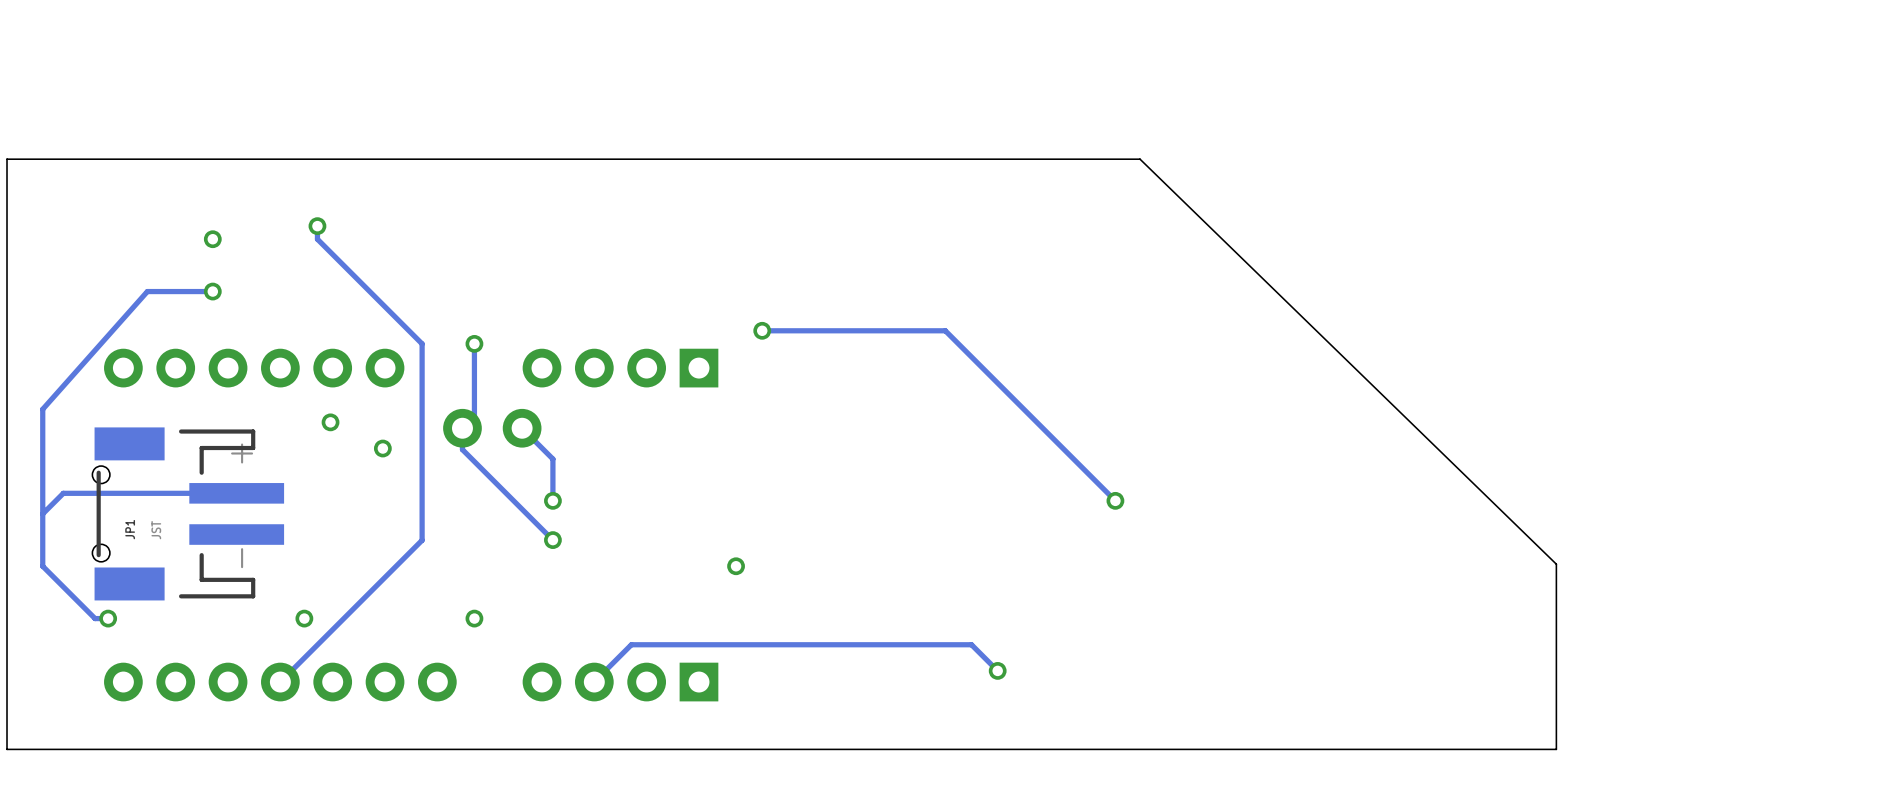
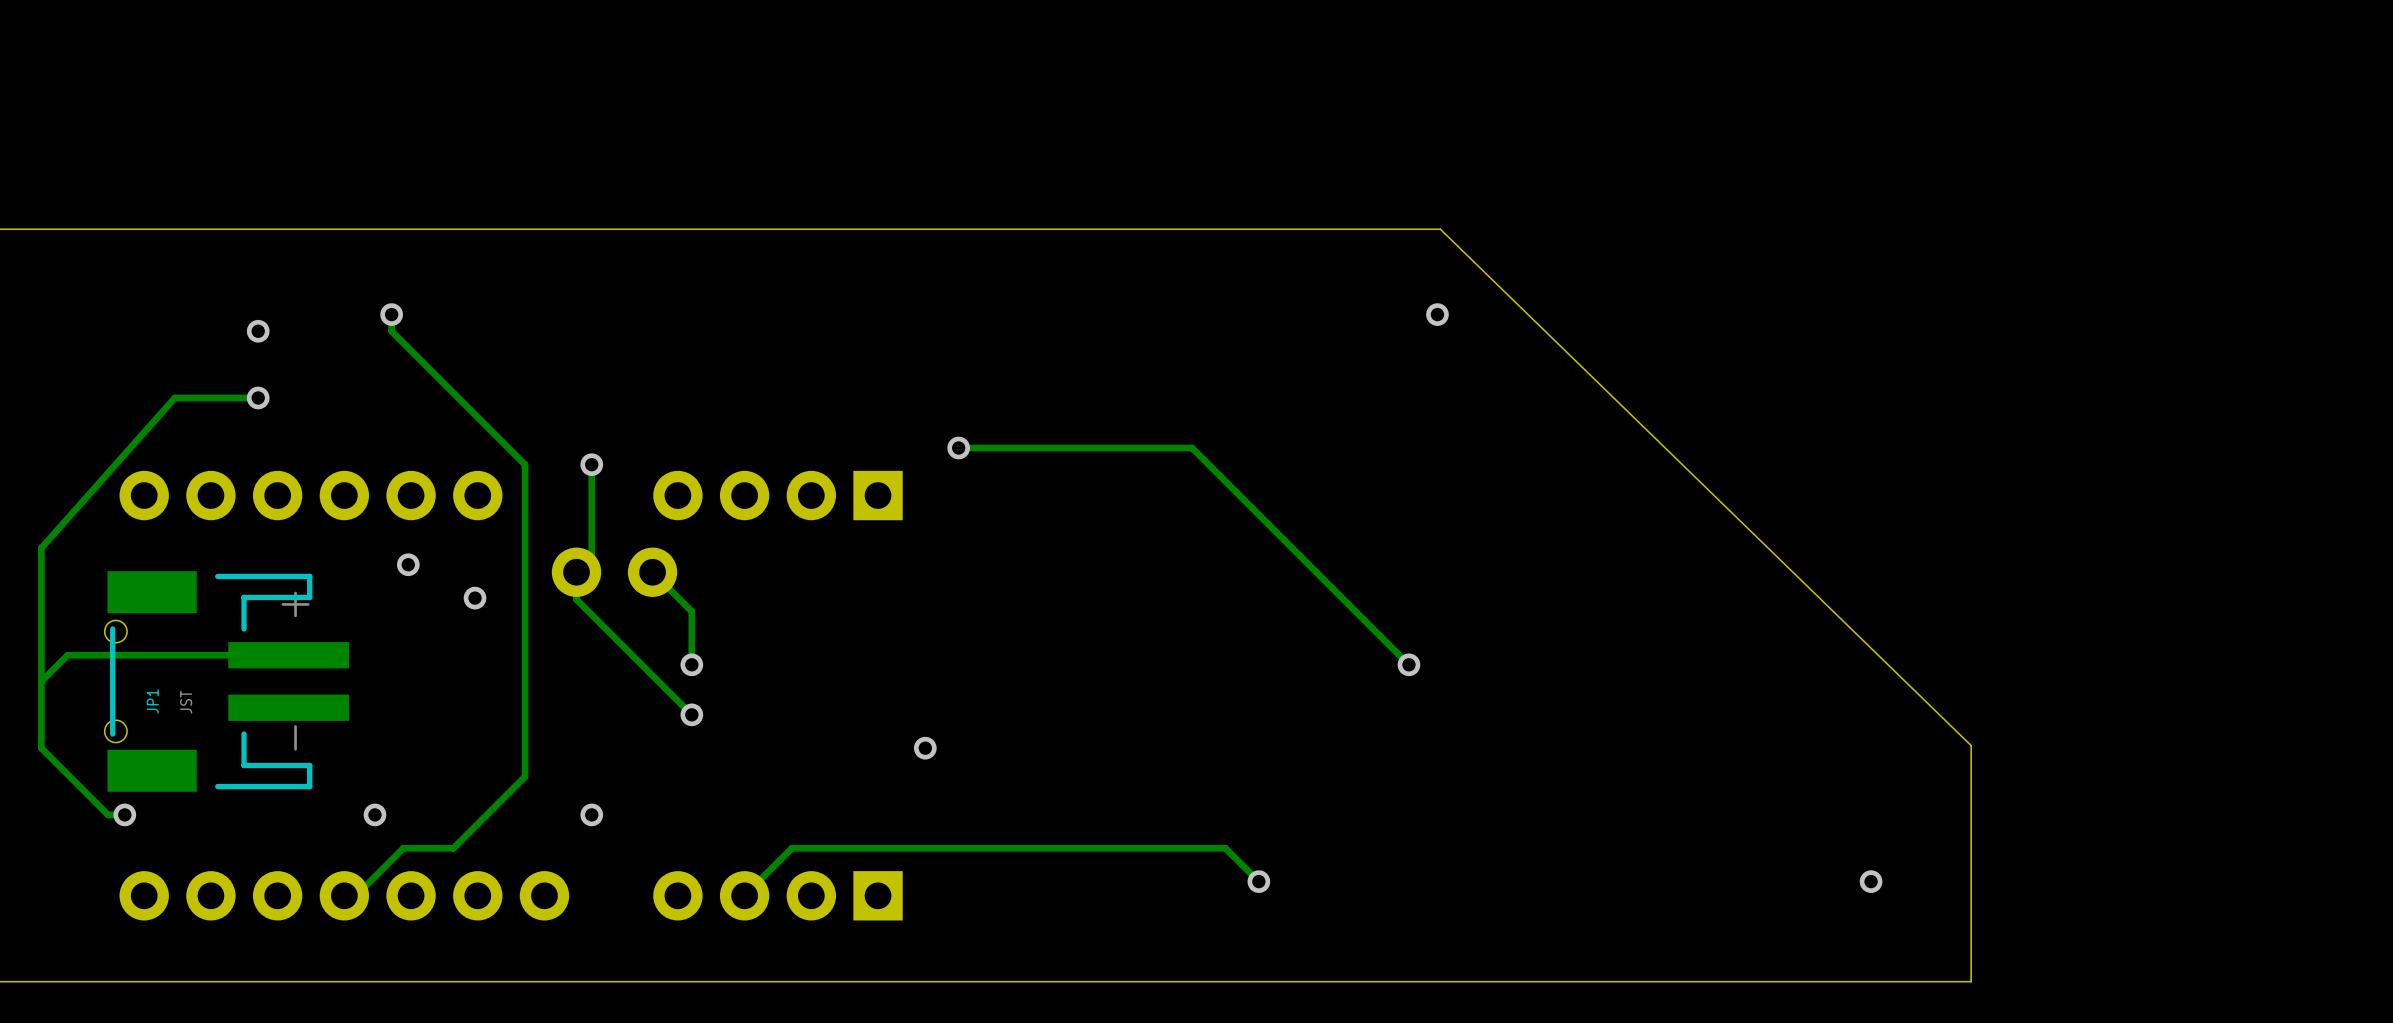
via: none -> (1437, 314)
track: (422, 540) (280, 682) -> (525, 715) (525, 776) (453, 848) (403, 848) (355, 895) (344, 895)
via: none -> (1871, 881)

